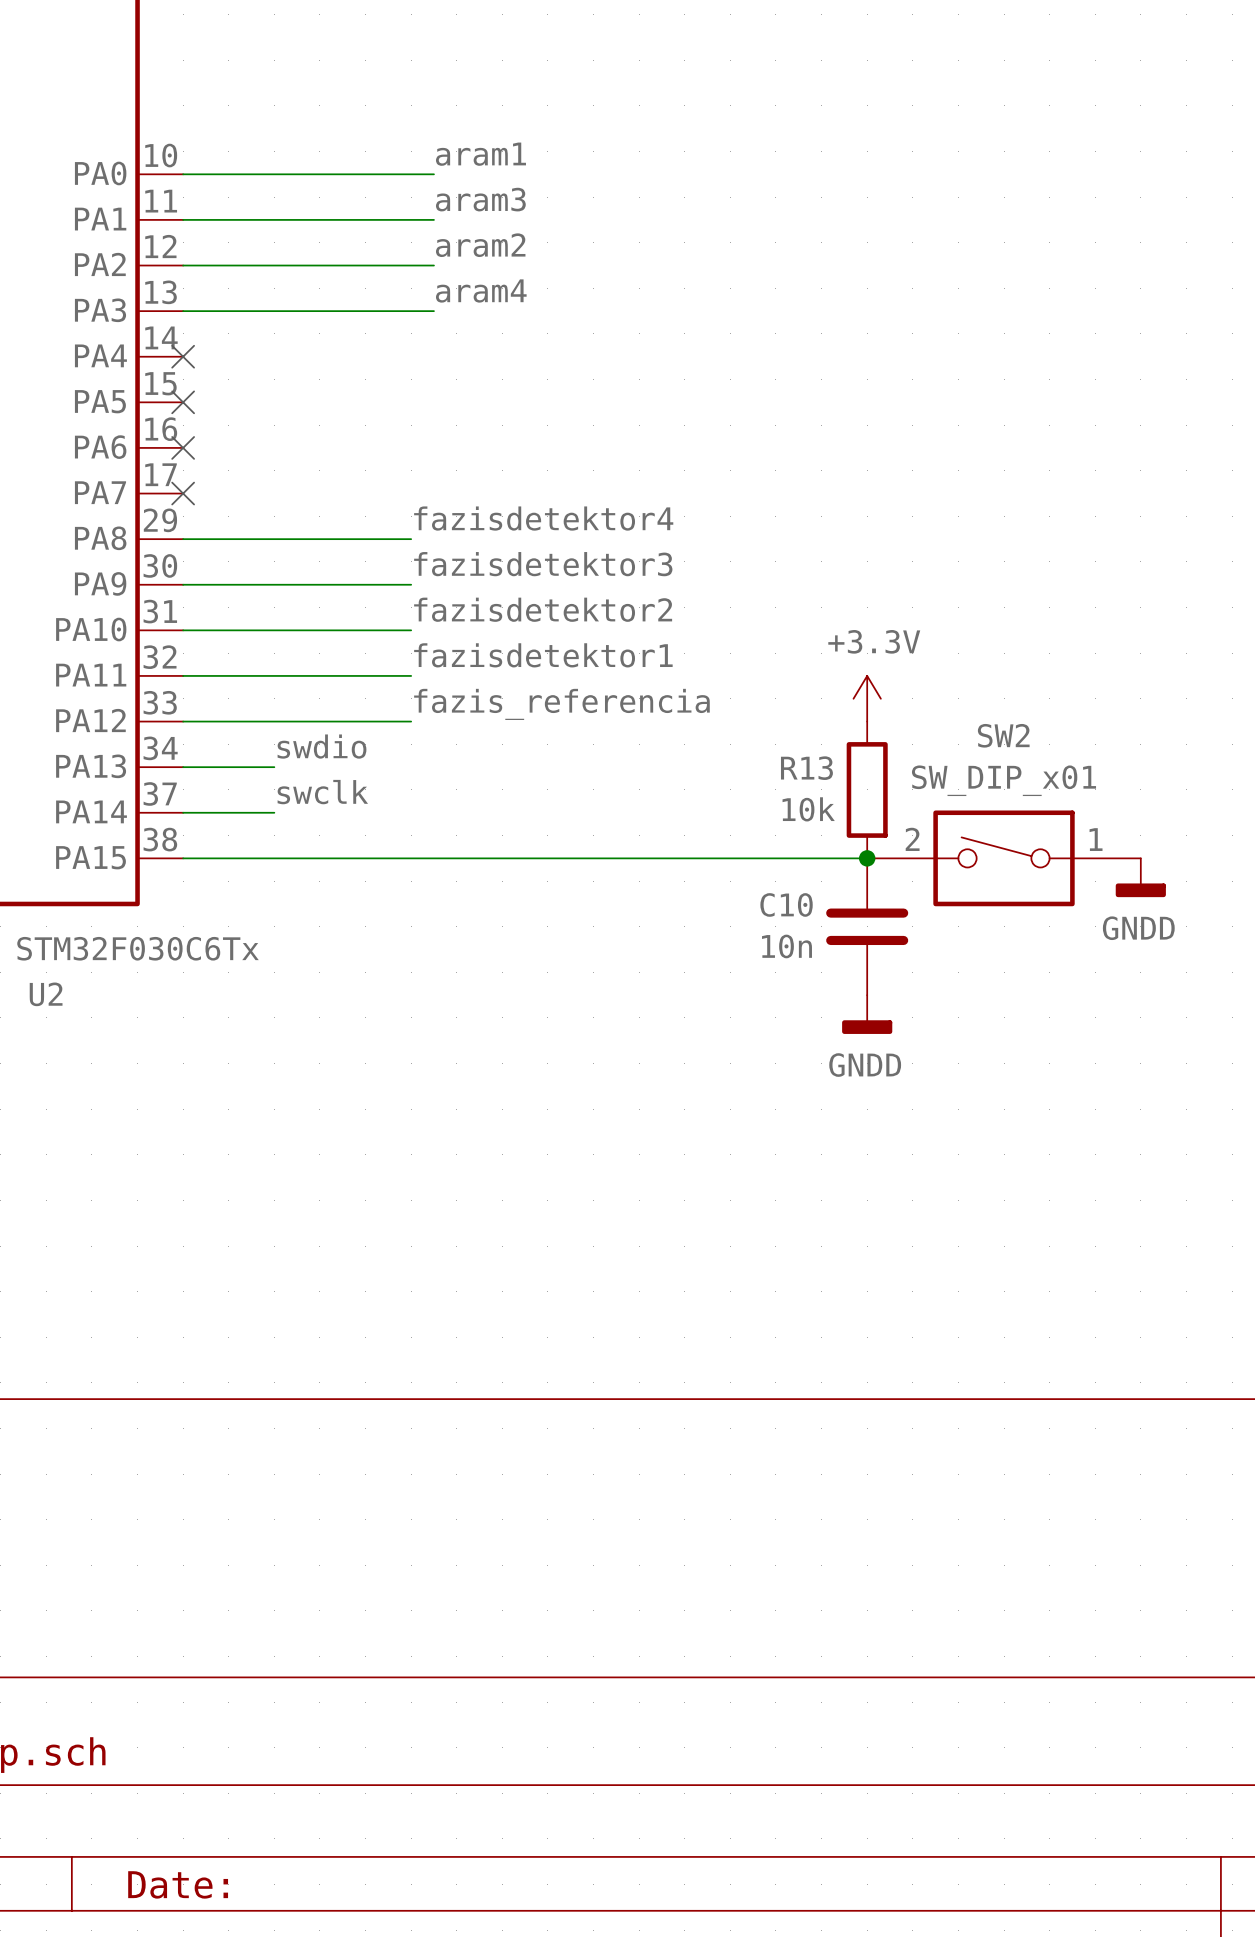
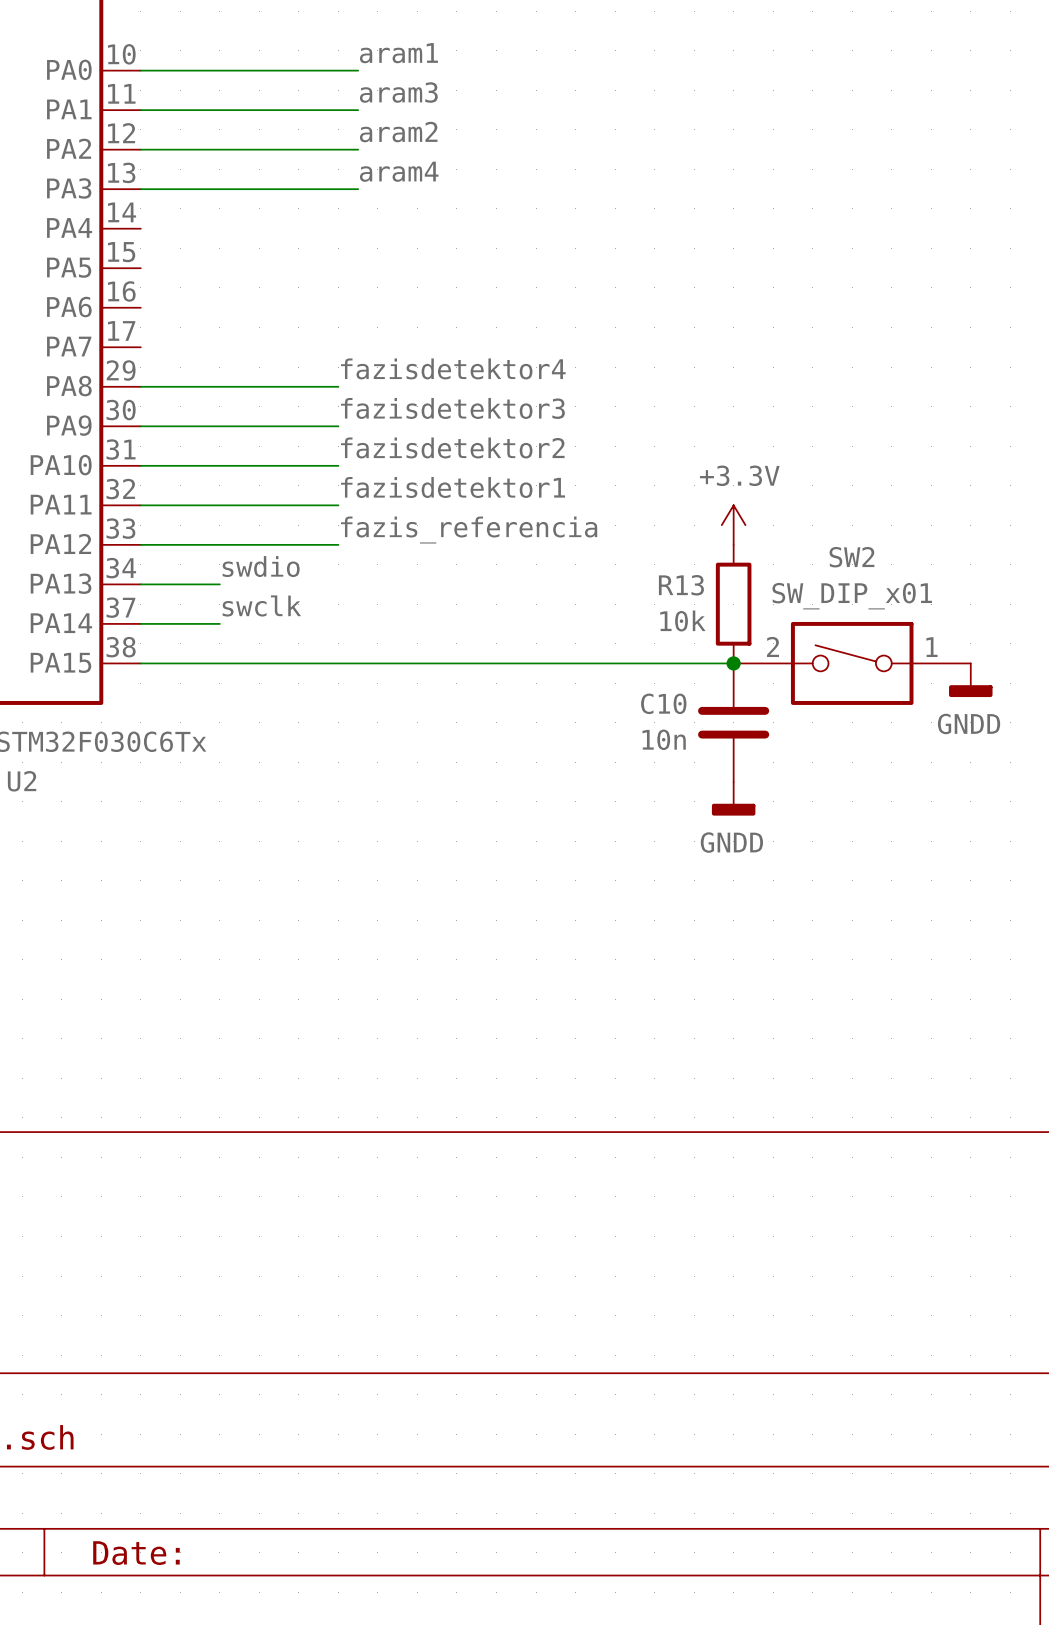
no-connect mark: (183, 356) -> none
no-connect mark: (183, 402) -> none
no-connect mark: (183, 447) -> none
no-connect mark: (183, 493) -> none

